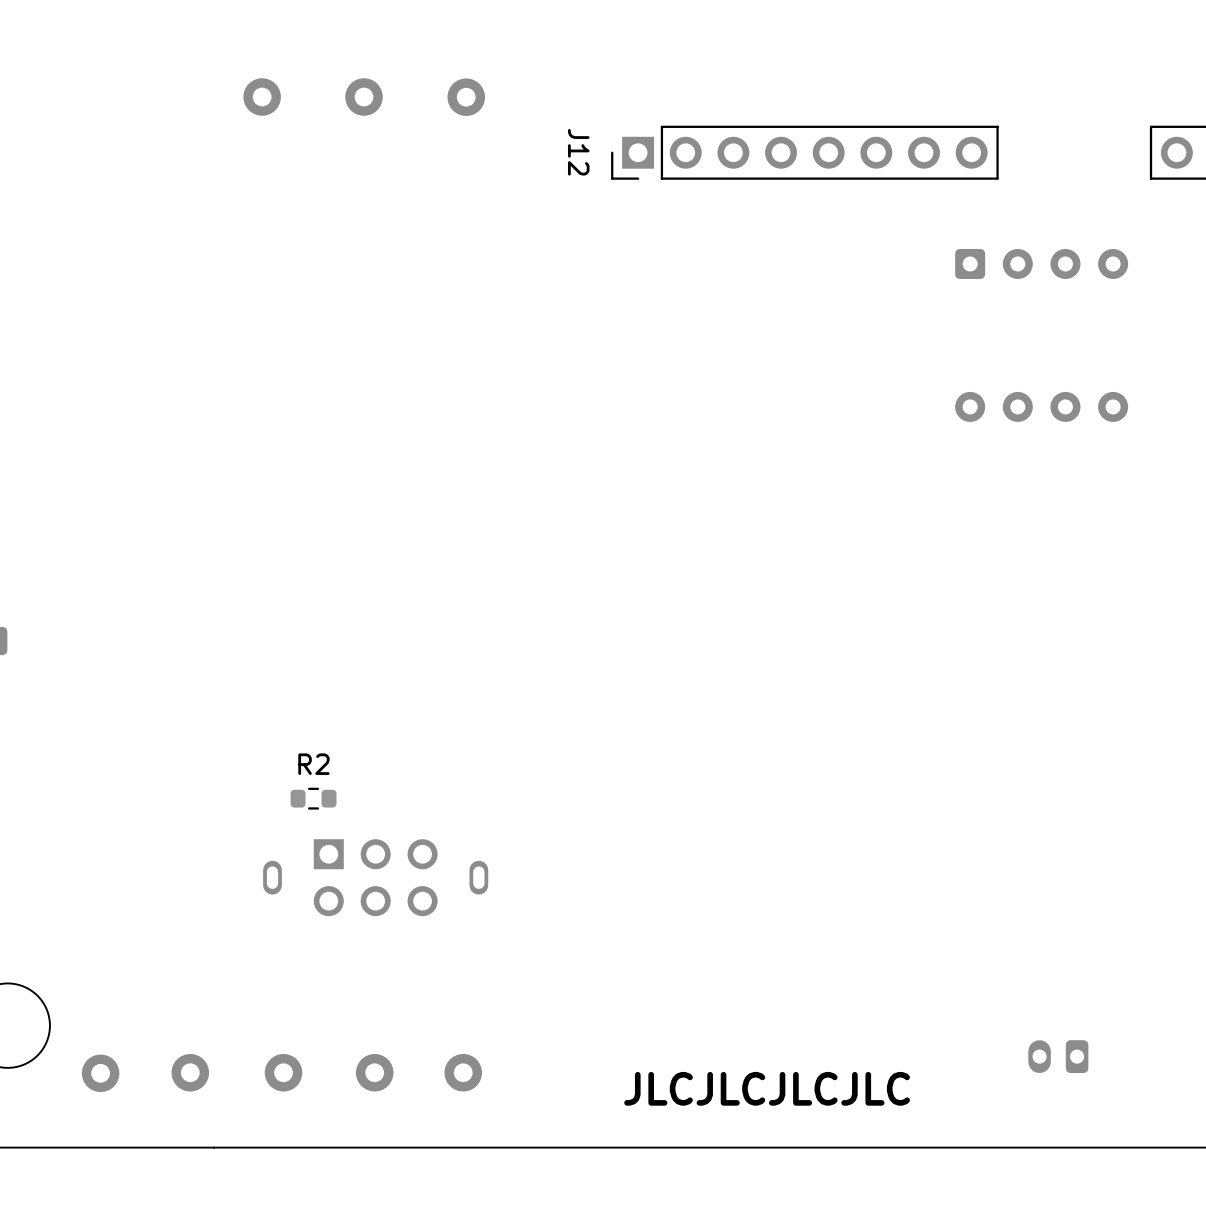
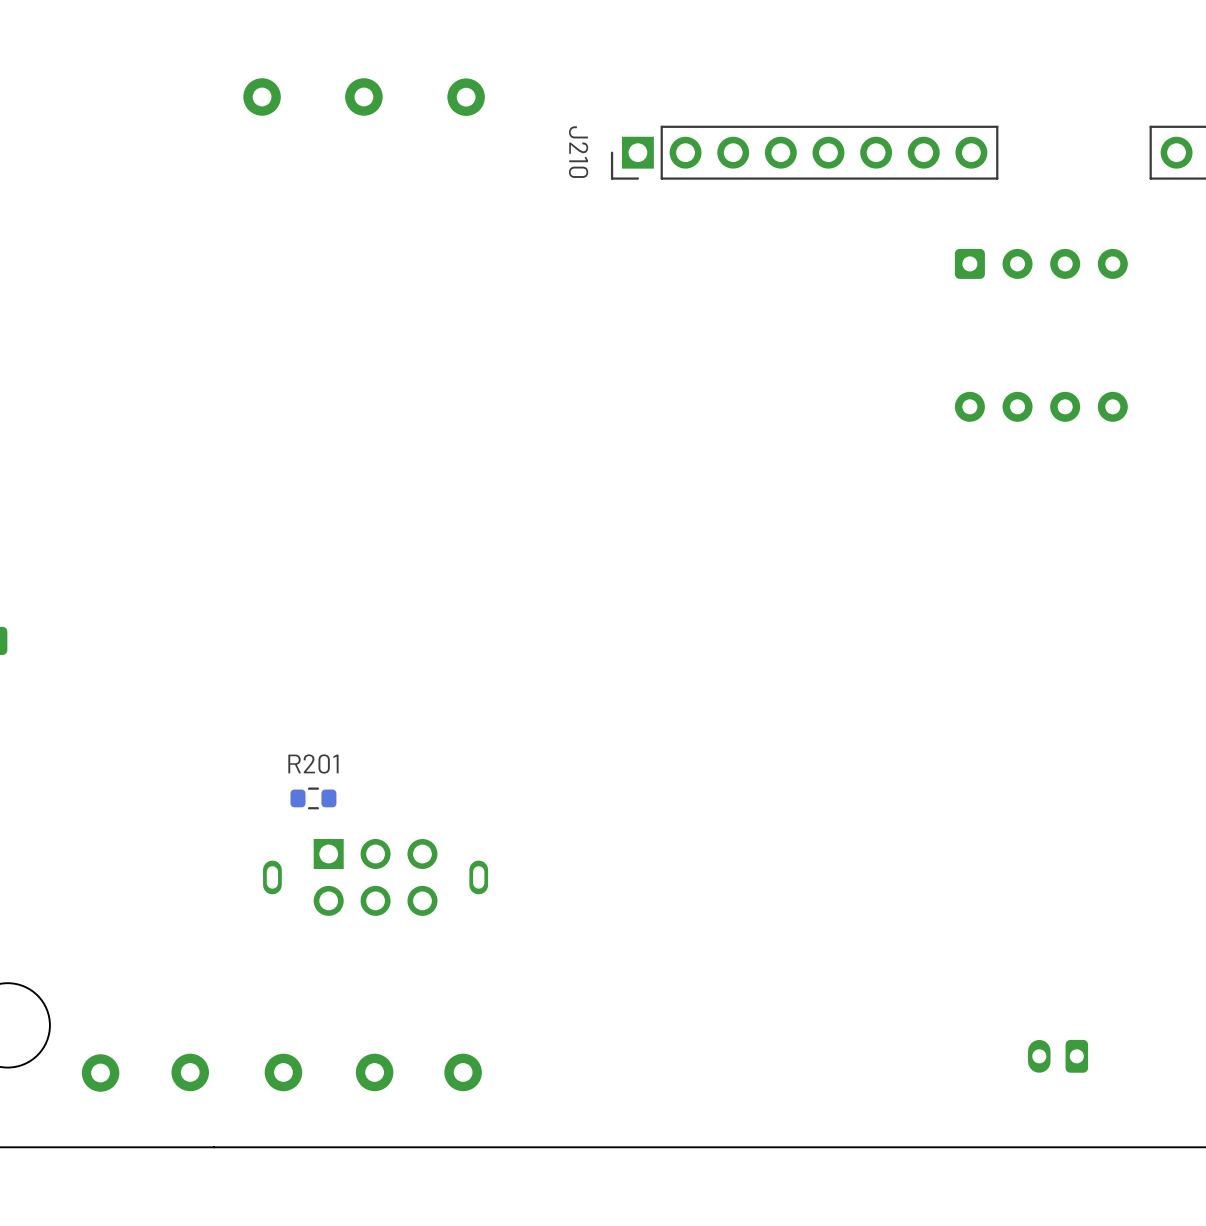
J12 name: J12 (578, 152) -> J210 (578, 152)
R2 name: R2 (313, 764) -> R201 (313, 763)
text: JLCJLCJLCJLC (767, 1088) -> none

